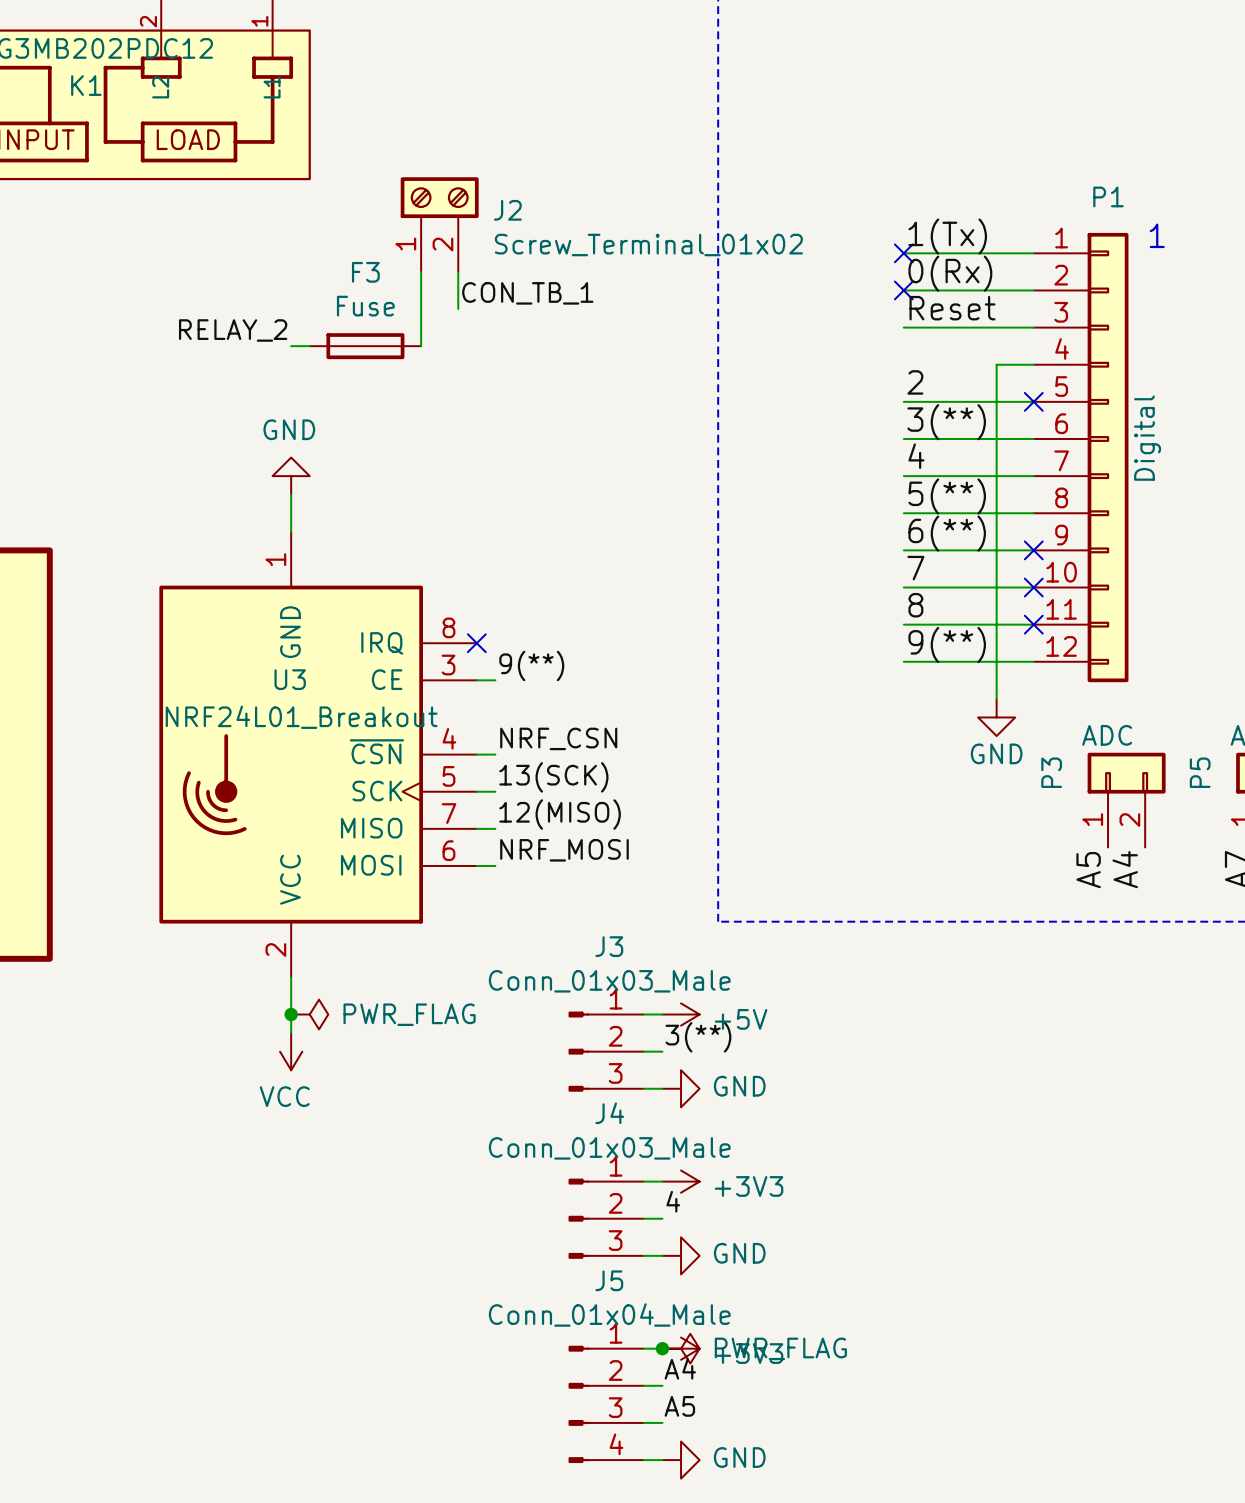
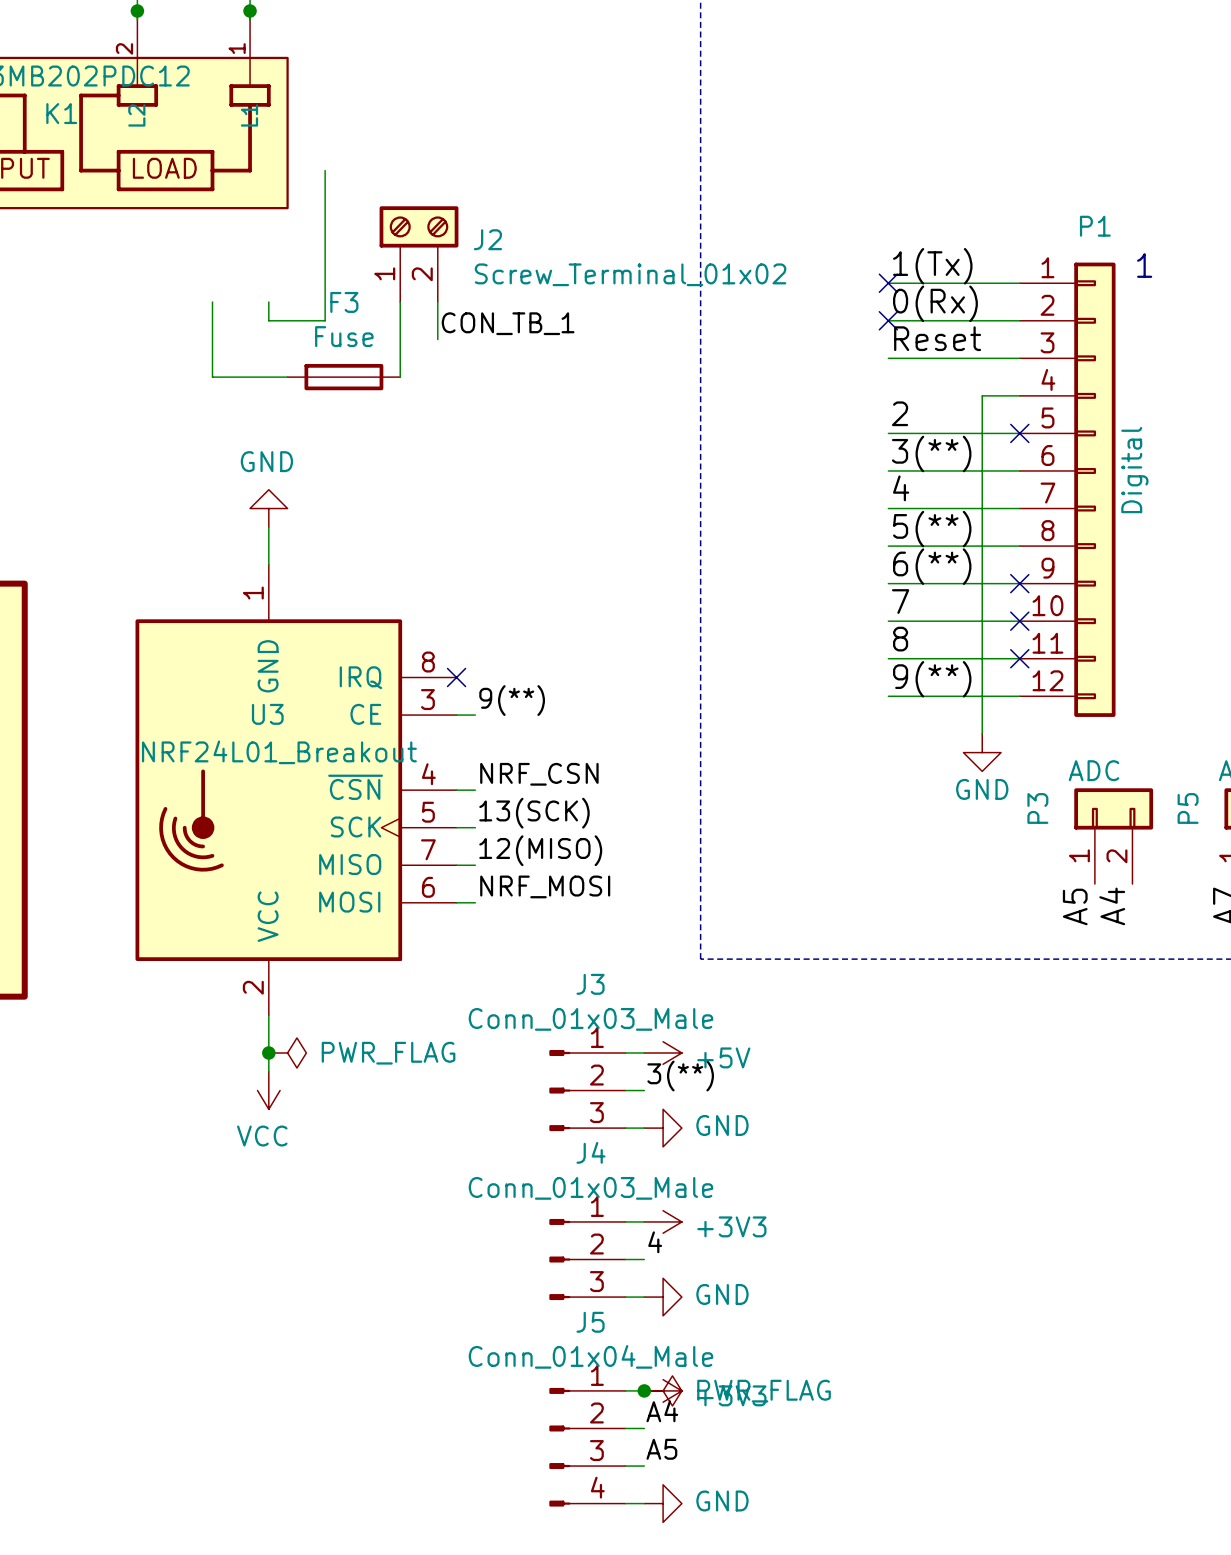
wire: none -> (325, 170) (325, 320) (268, 320) (268, 302)
wire: none -> (212, 302) (212, 377) (268, 377)
label: RELAY_2 (233, 330) -> none

